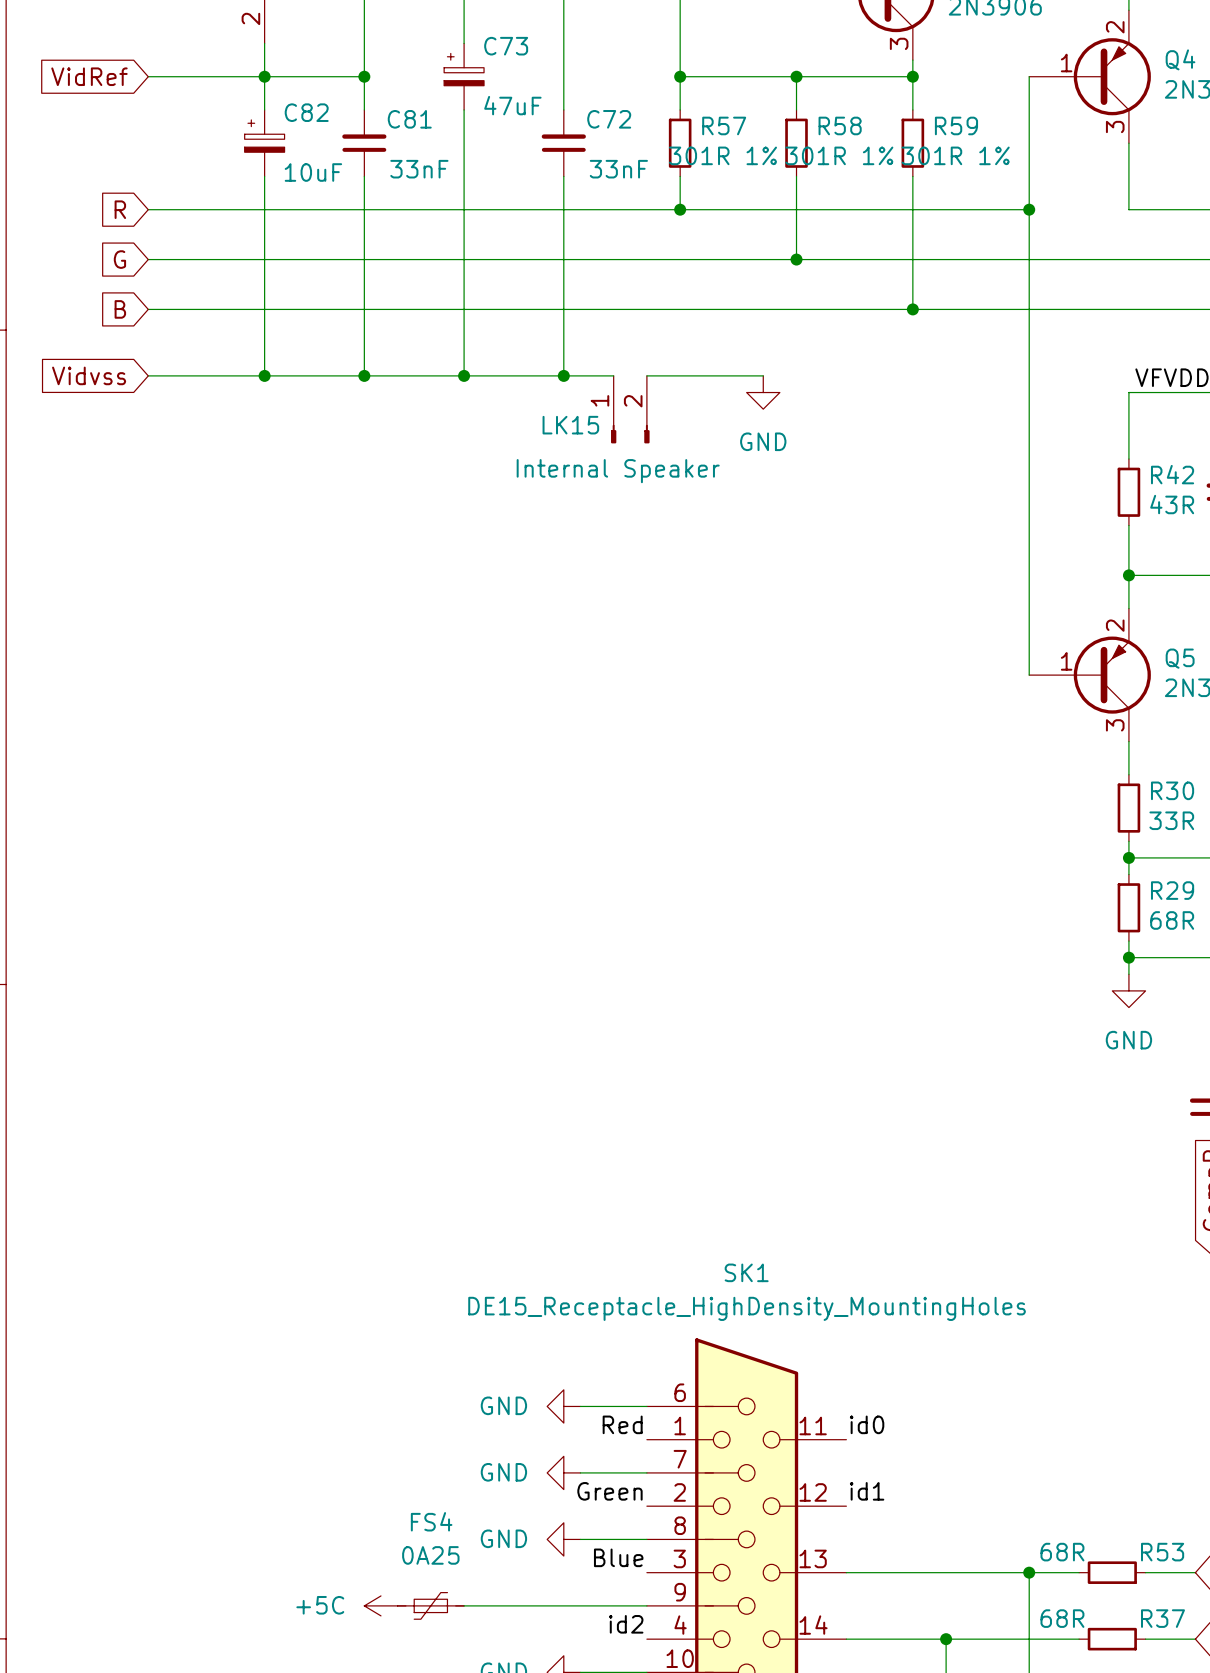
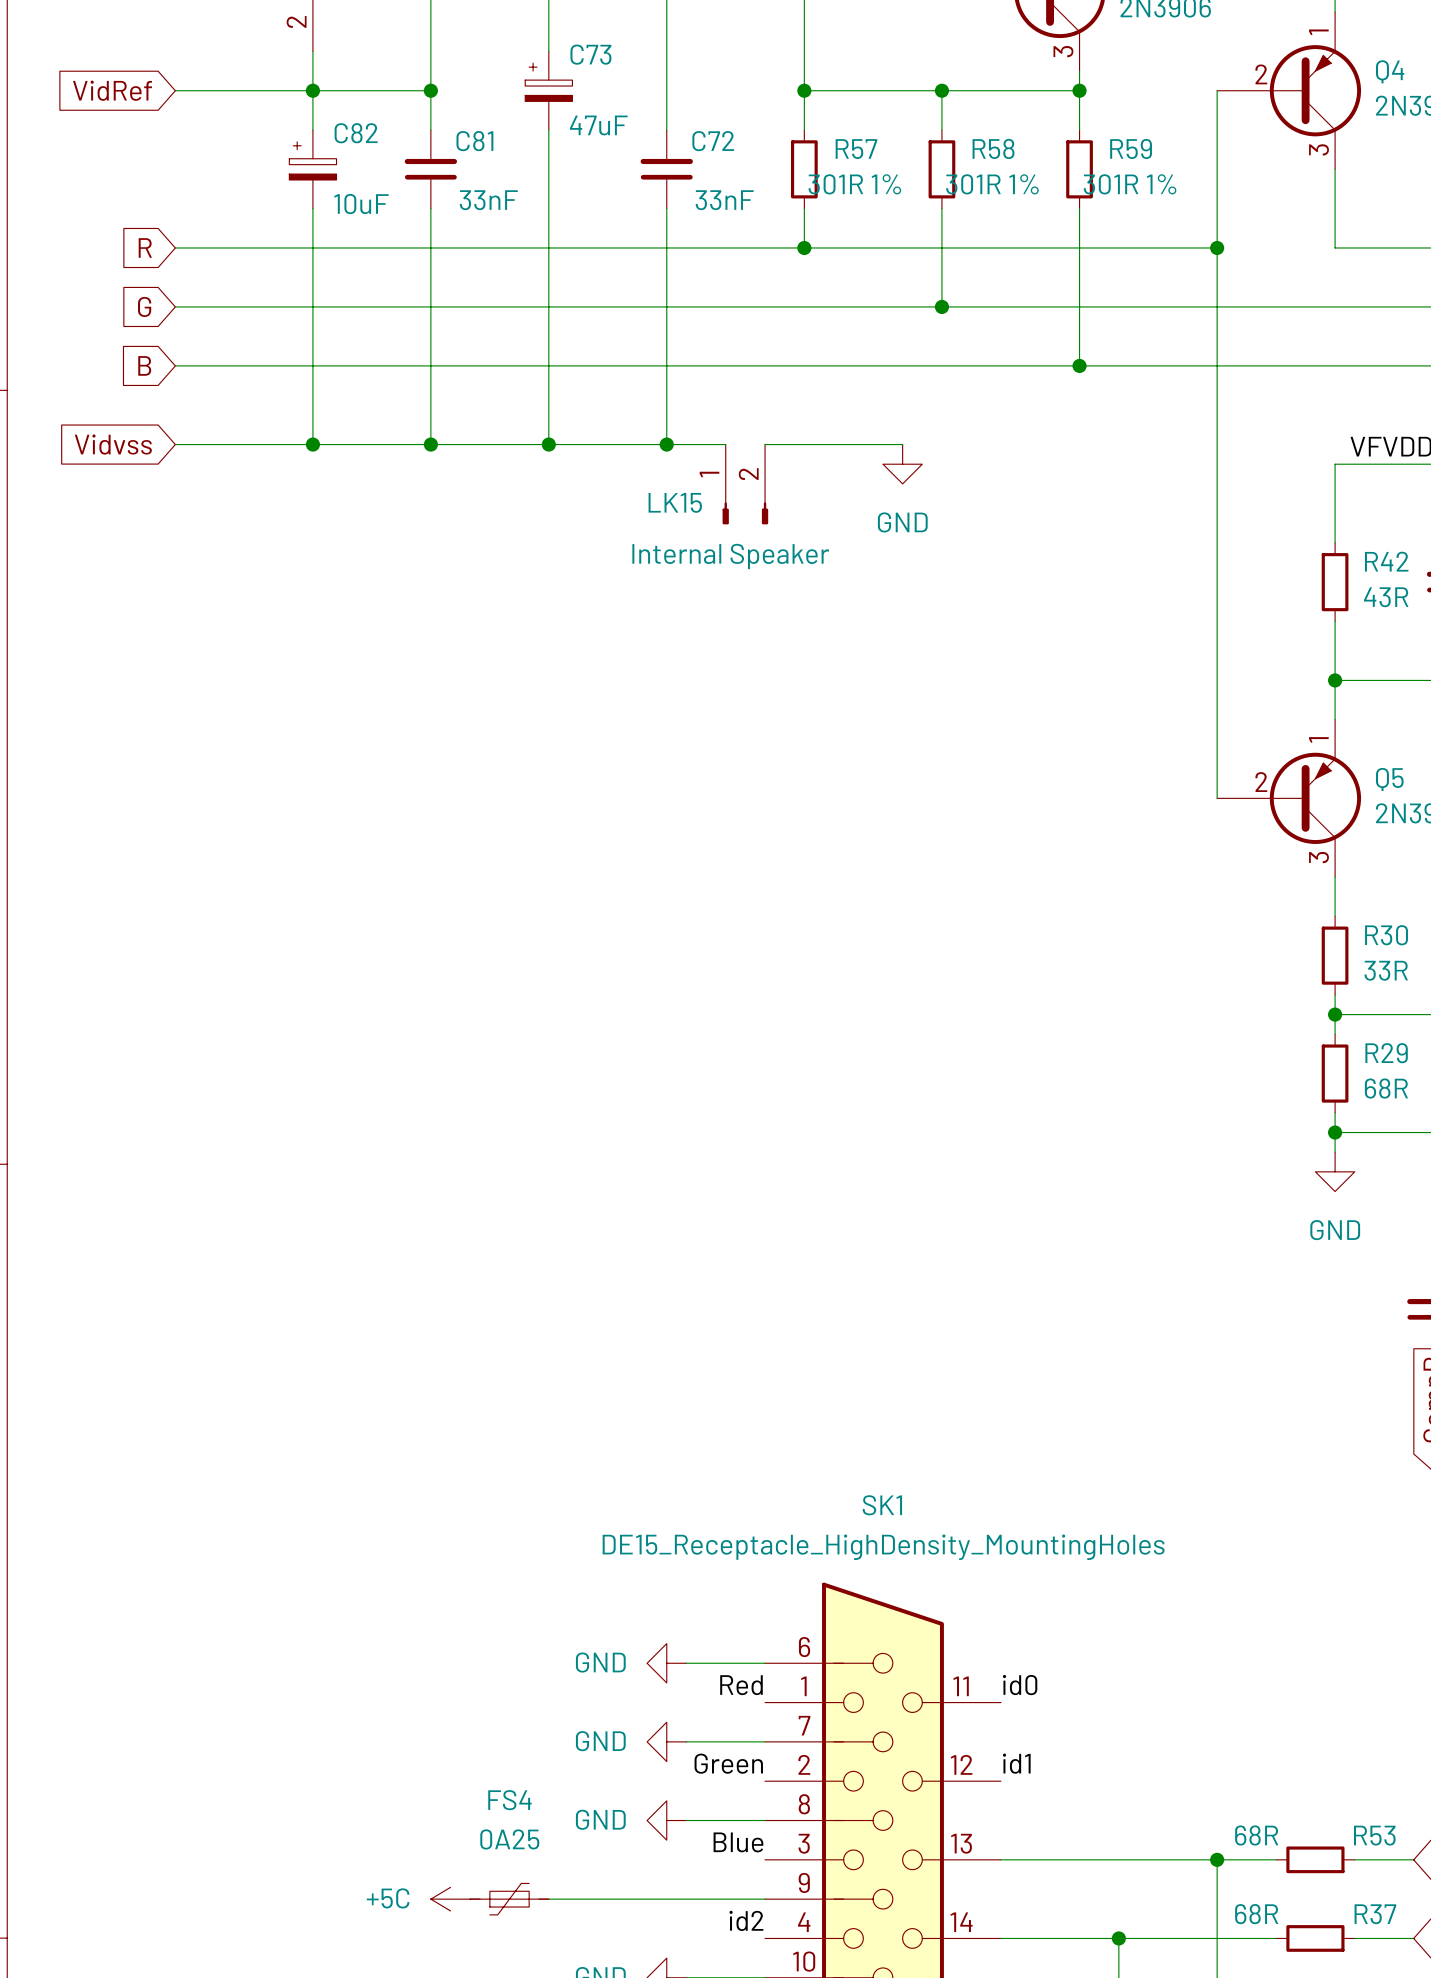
Q4 pin number: 2 (1115, 27) -> 1 (1318, 32)
Q4 pin number: 1 (1066, 63) -> 2 (1261, 74)
Q5 pin number: 2 (1115, 625) -> 1 (1318, 739)
Q5 pin number: 1 (1066, 661) -> 2 (1261, 782)

